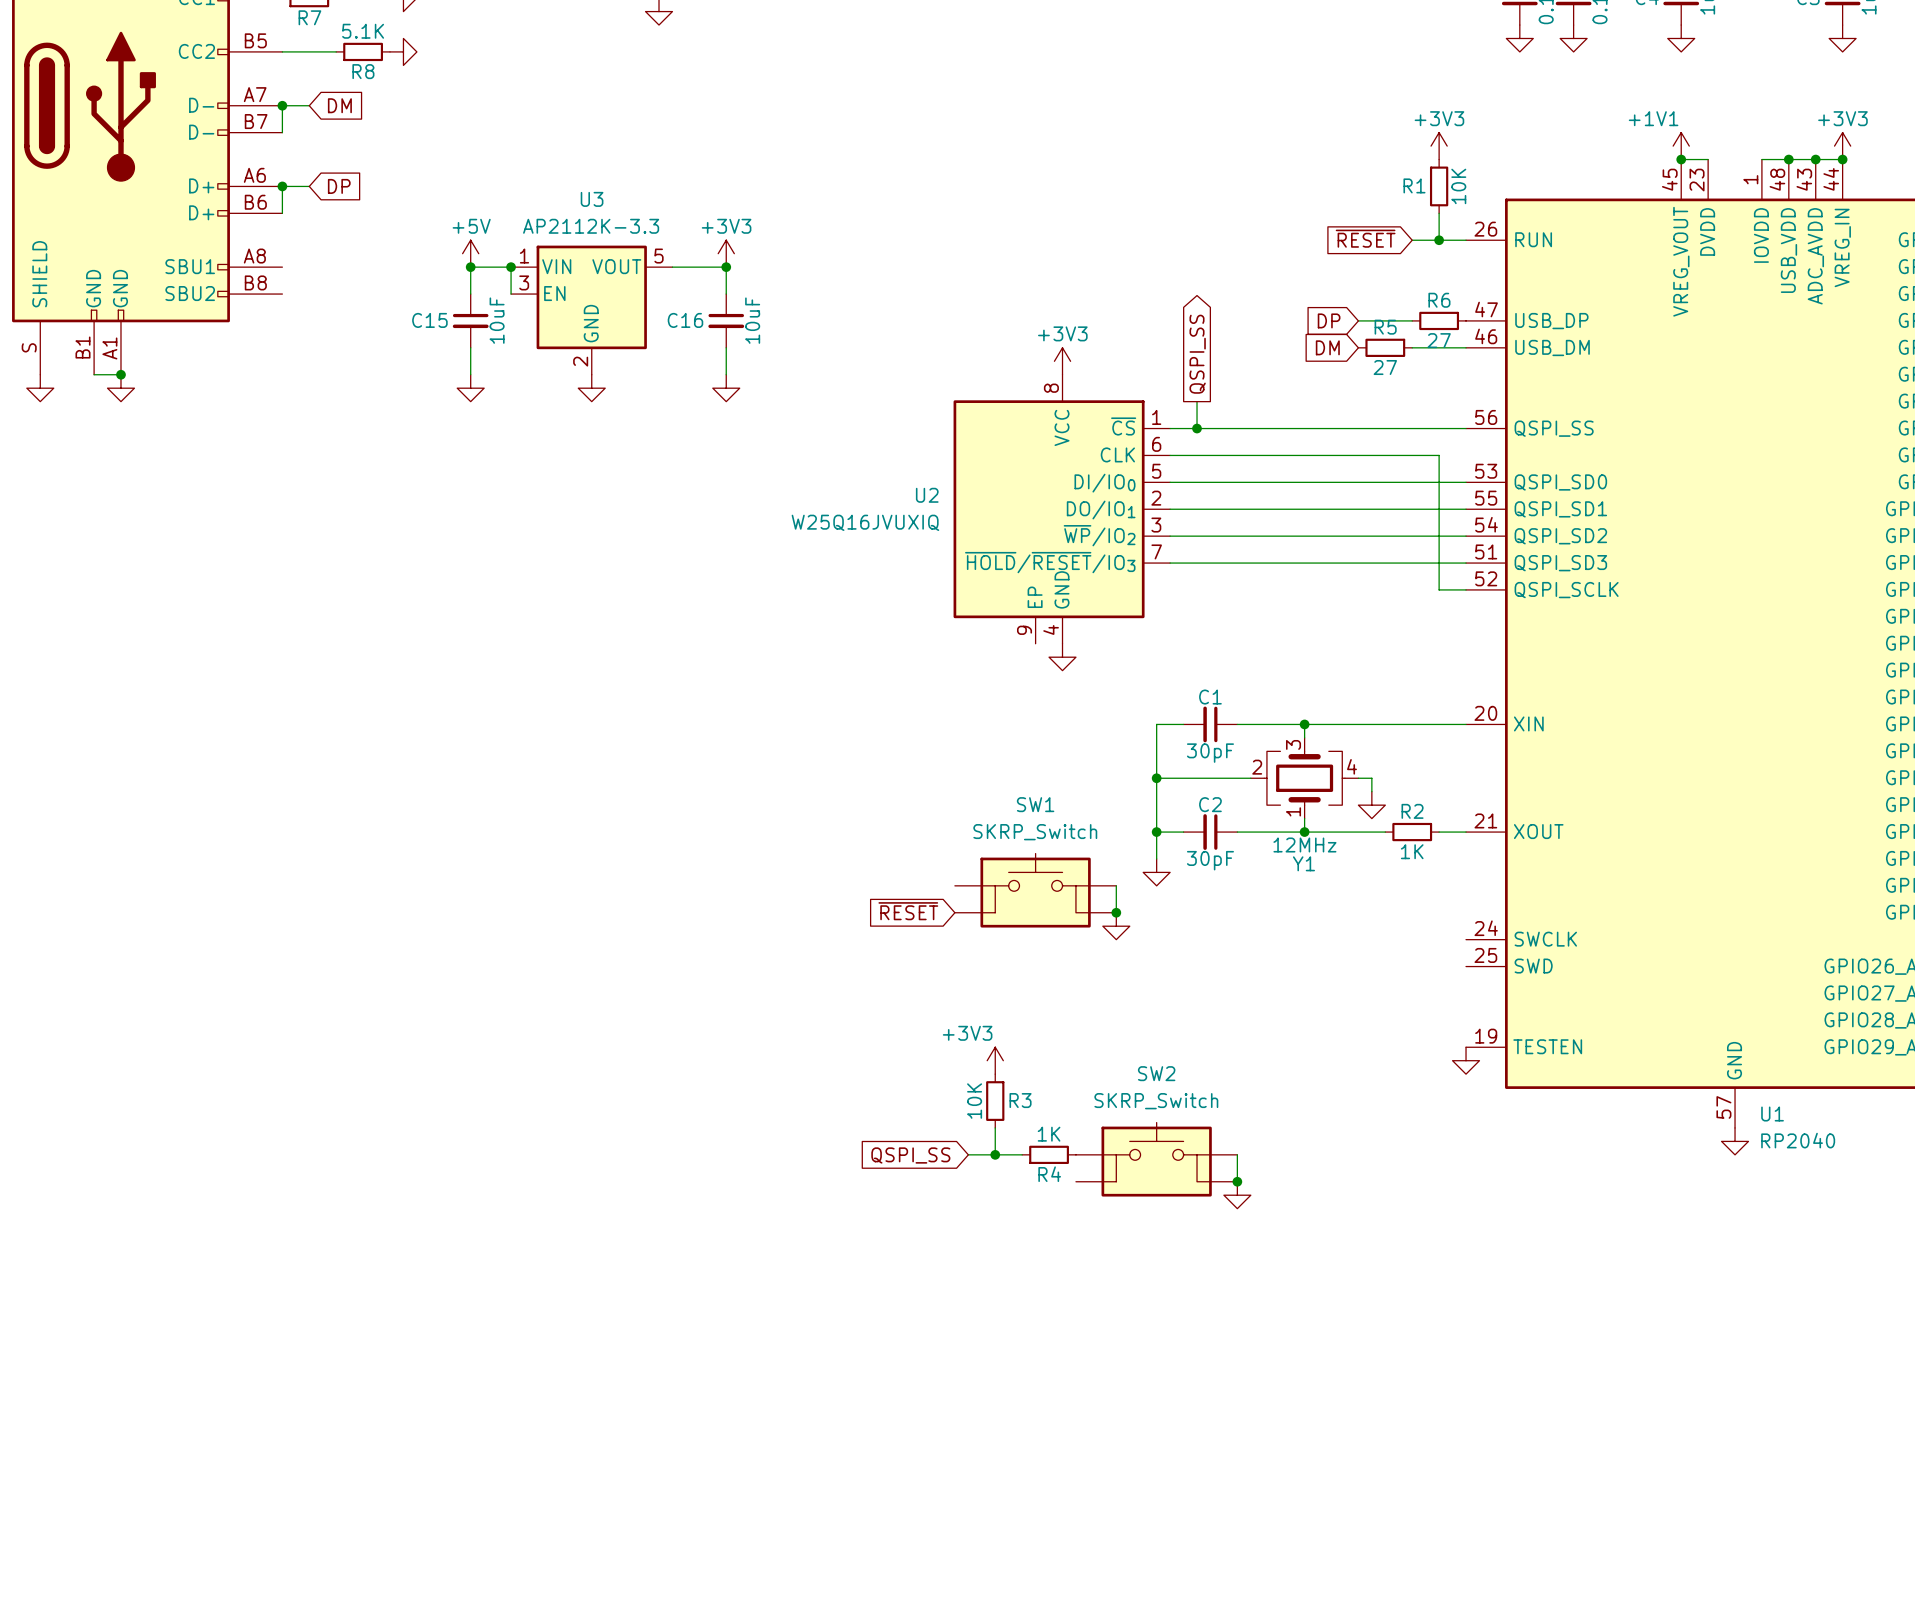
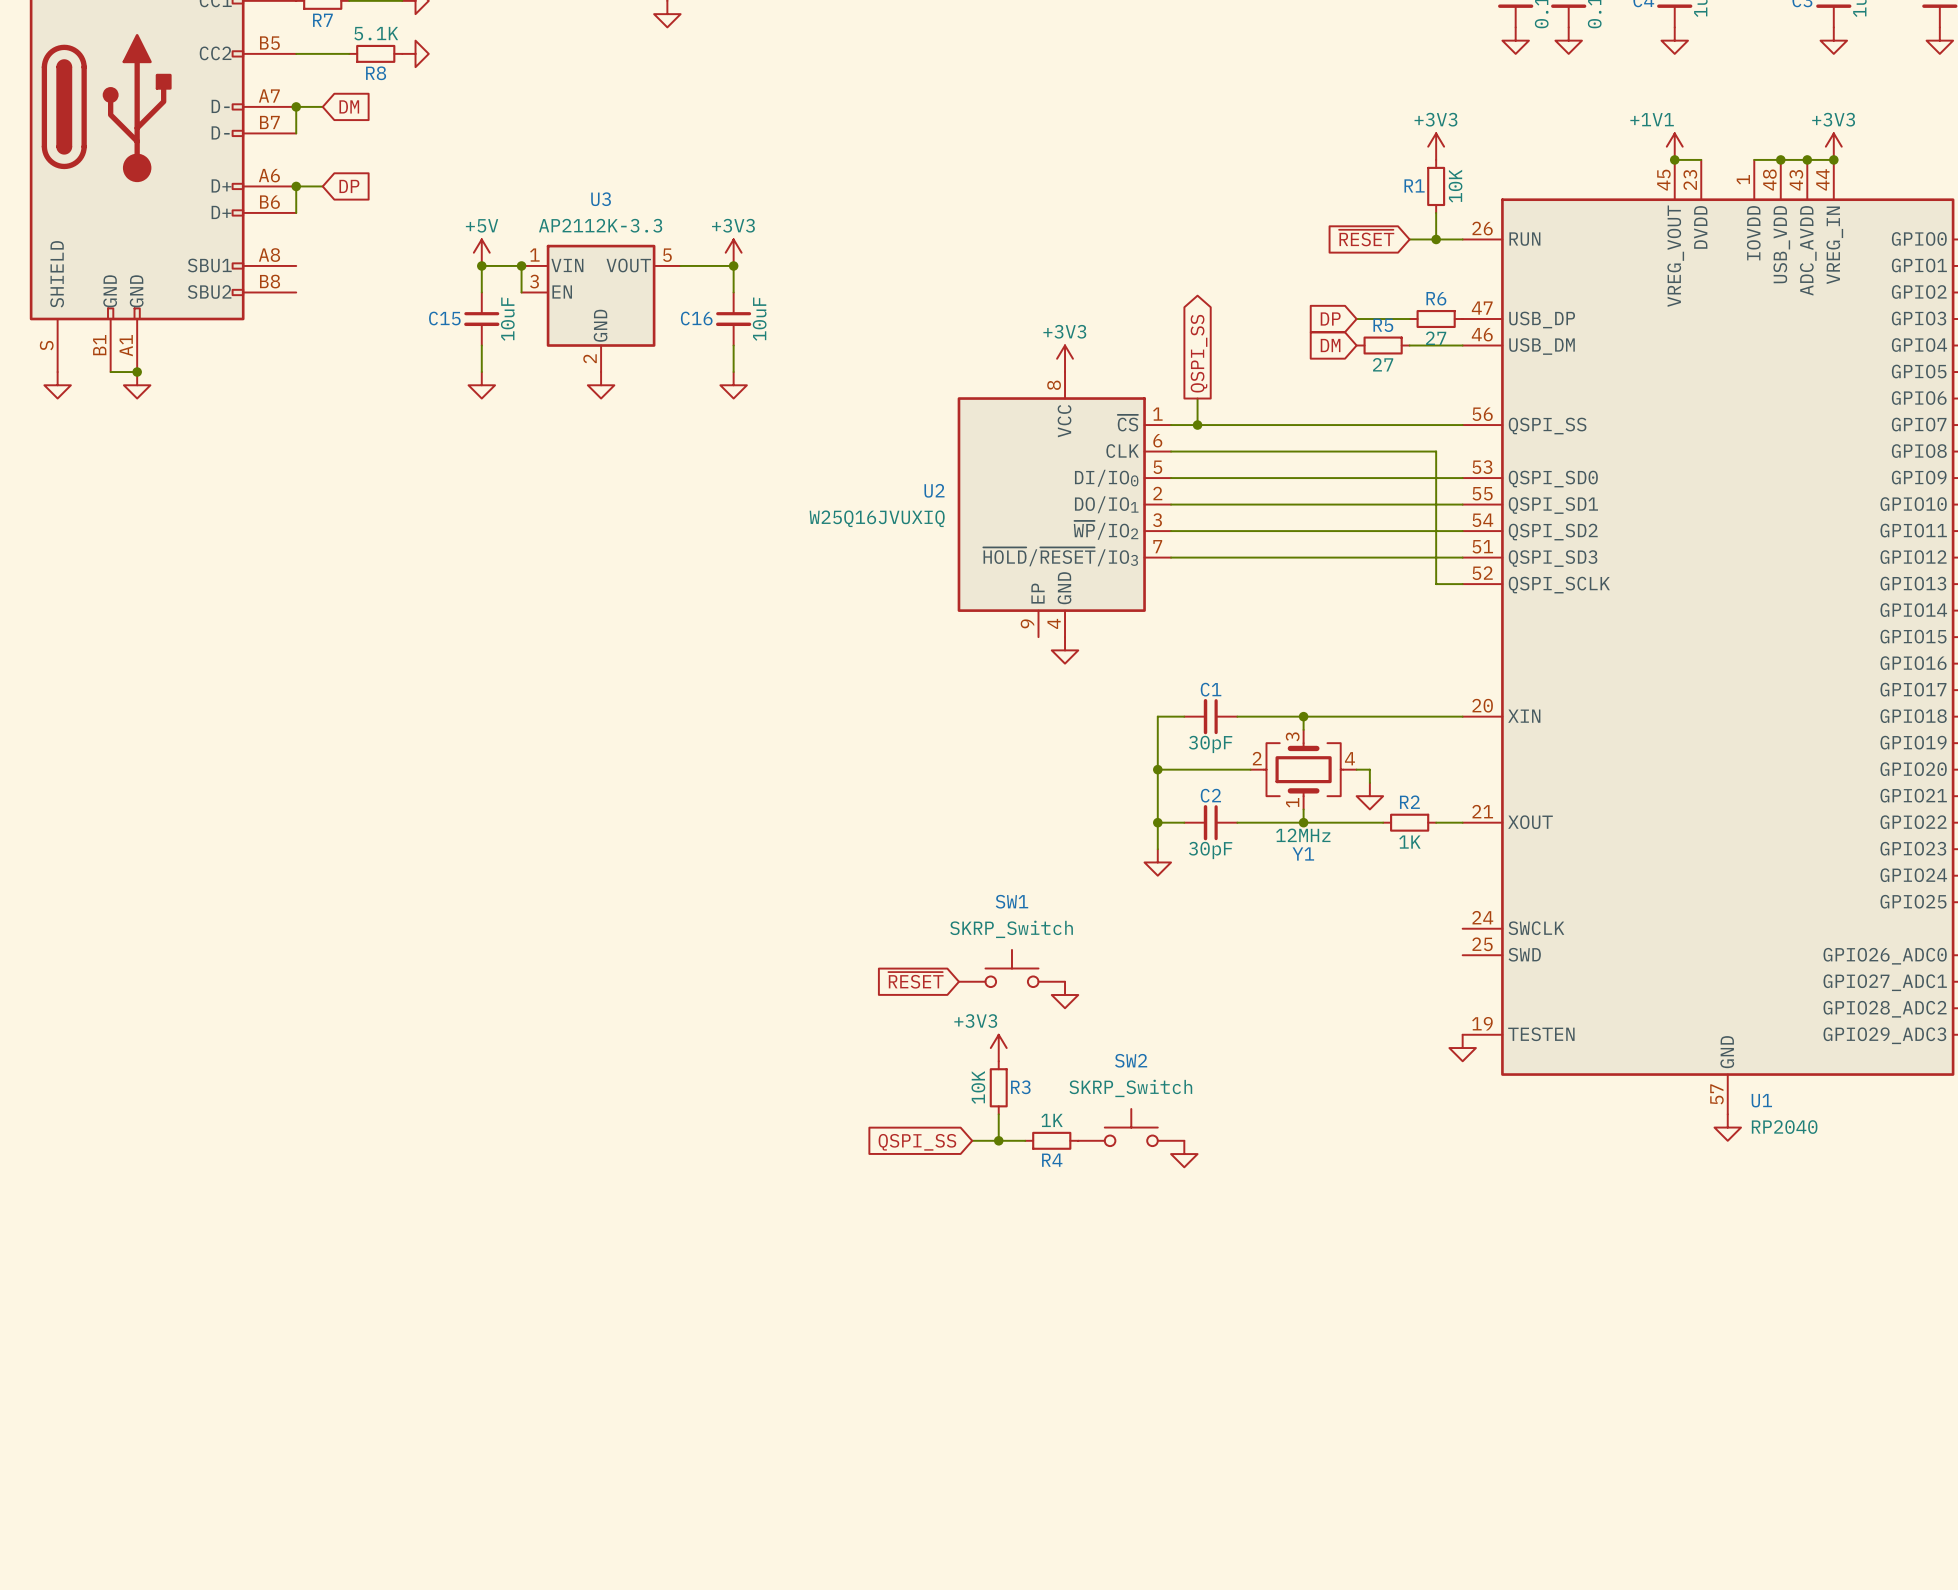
SW1 symbol: [954, 853, 1117, 928] -> [958, 949, 1066, 988]
wire: (1116, 885) (1116, 912) -> none
global label position: ~{RESET} (908, 911) -> ~{RESET} (916, 980)
junction: (1116, 912) -> none
power symbol position: (1116, 926) -> (1065, 995)
SW2 symbol: [1075, 1122, 1238, 1197] -> [1078, 1108, 1185, 1147]
wire: (1237, 1154) (1237, 1181) -> none
junction: (1237, 1181) -> none
power symbol position: (1237, 1195) -> (1184, 1154)

